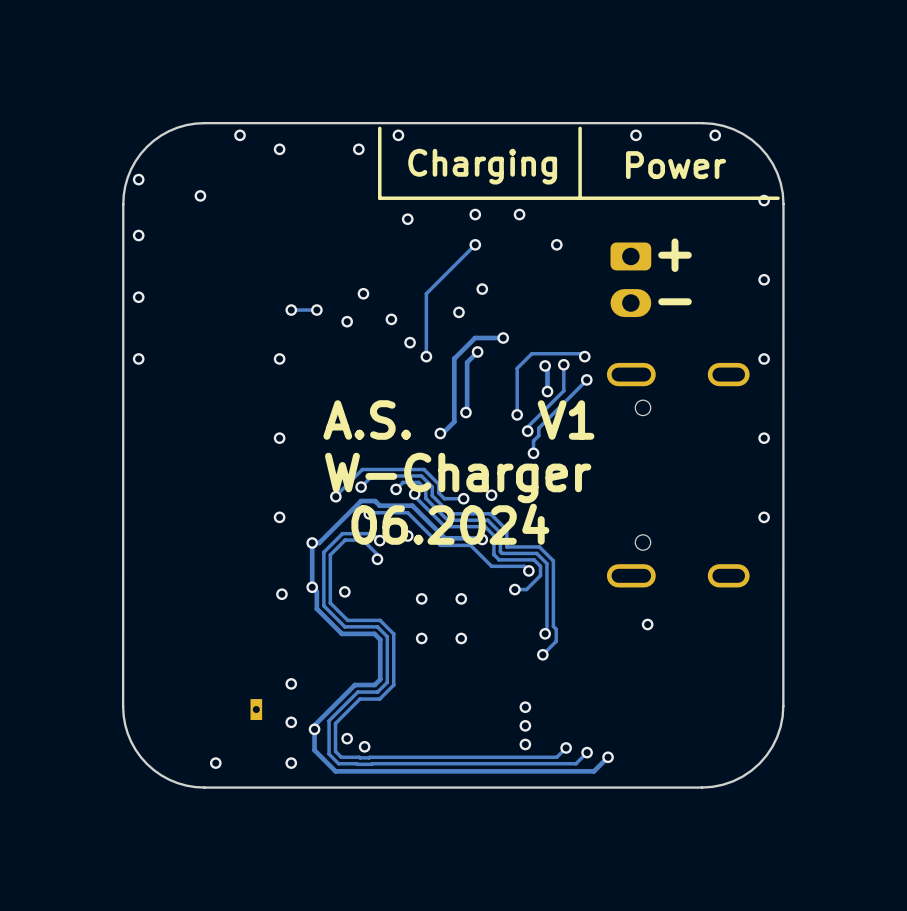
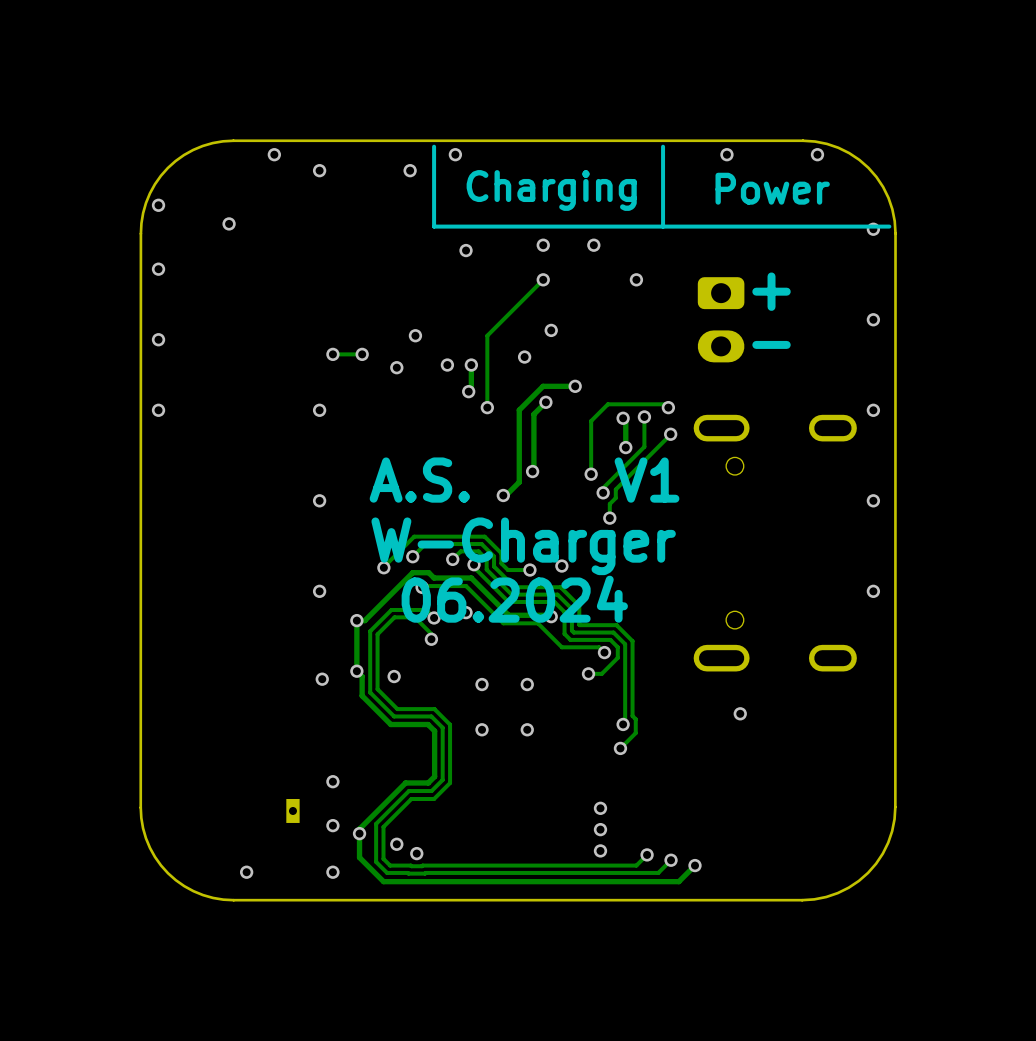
track: none -> (471, 365) (471, 388)
via: none -> (471, 365)

